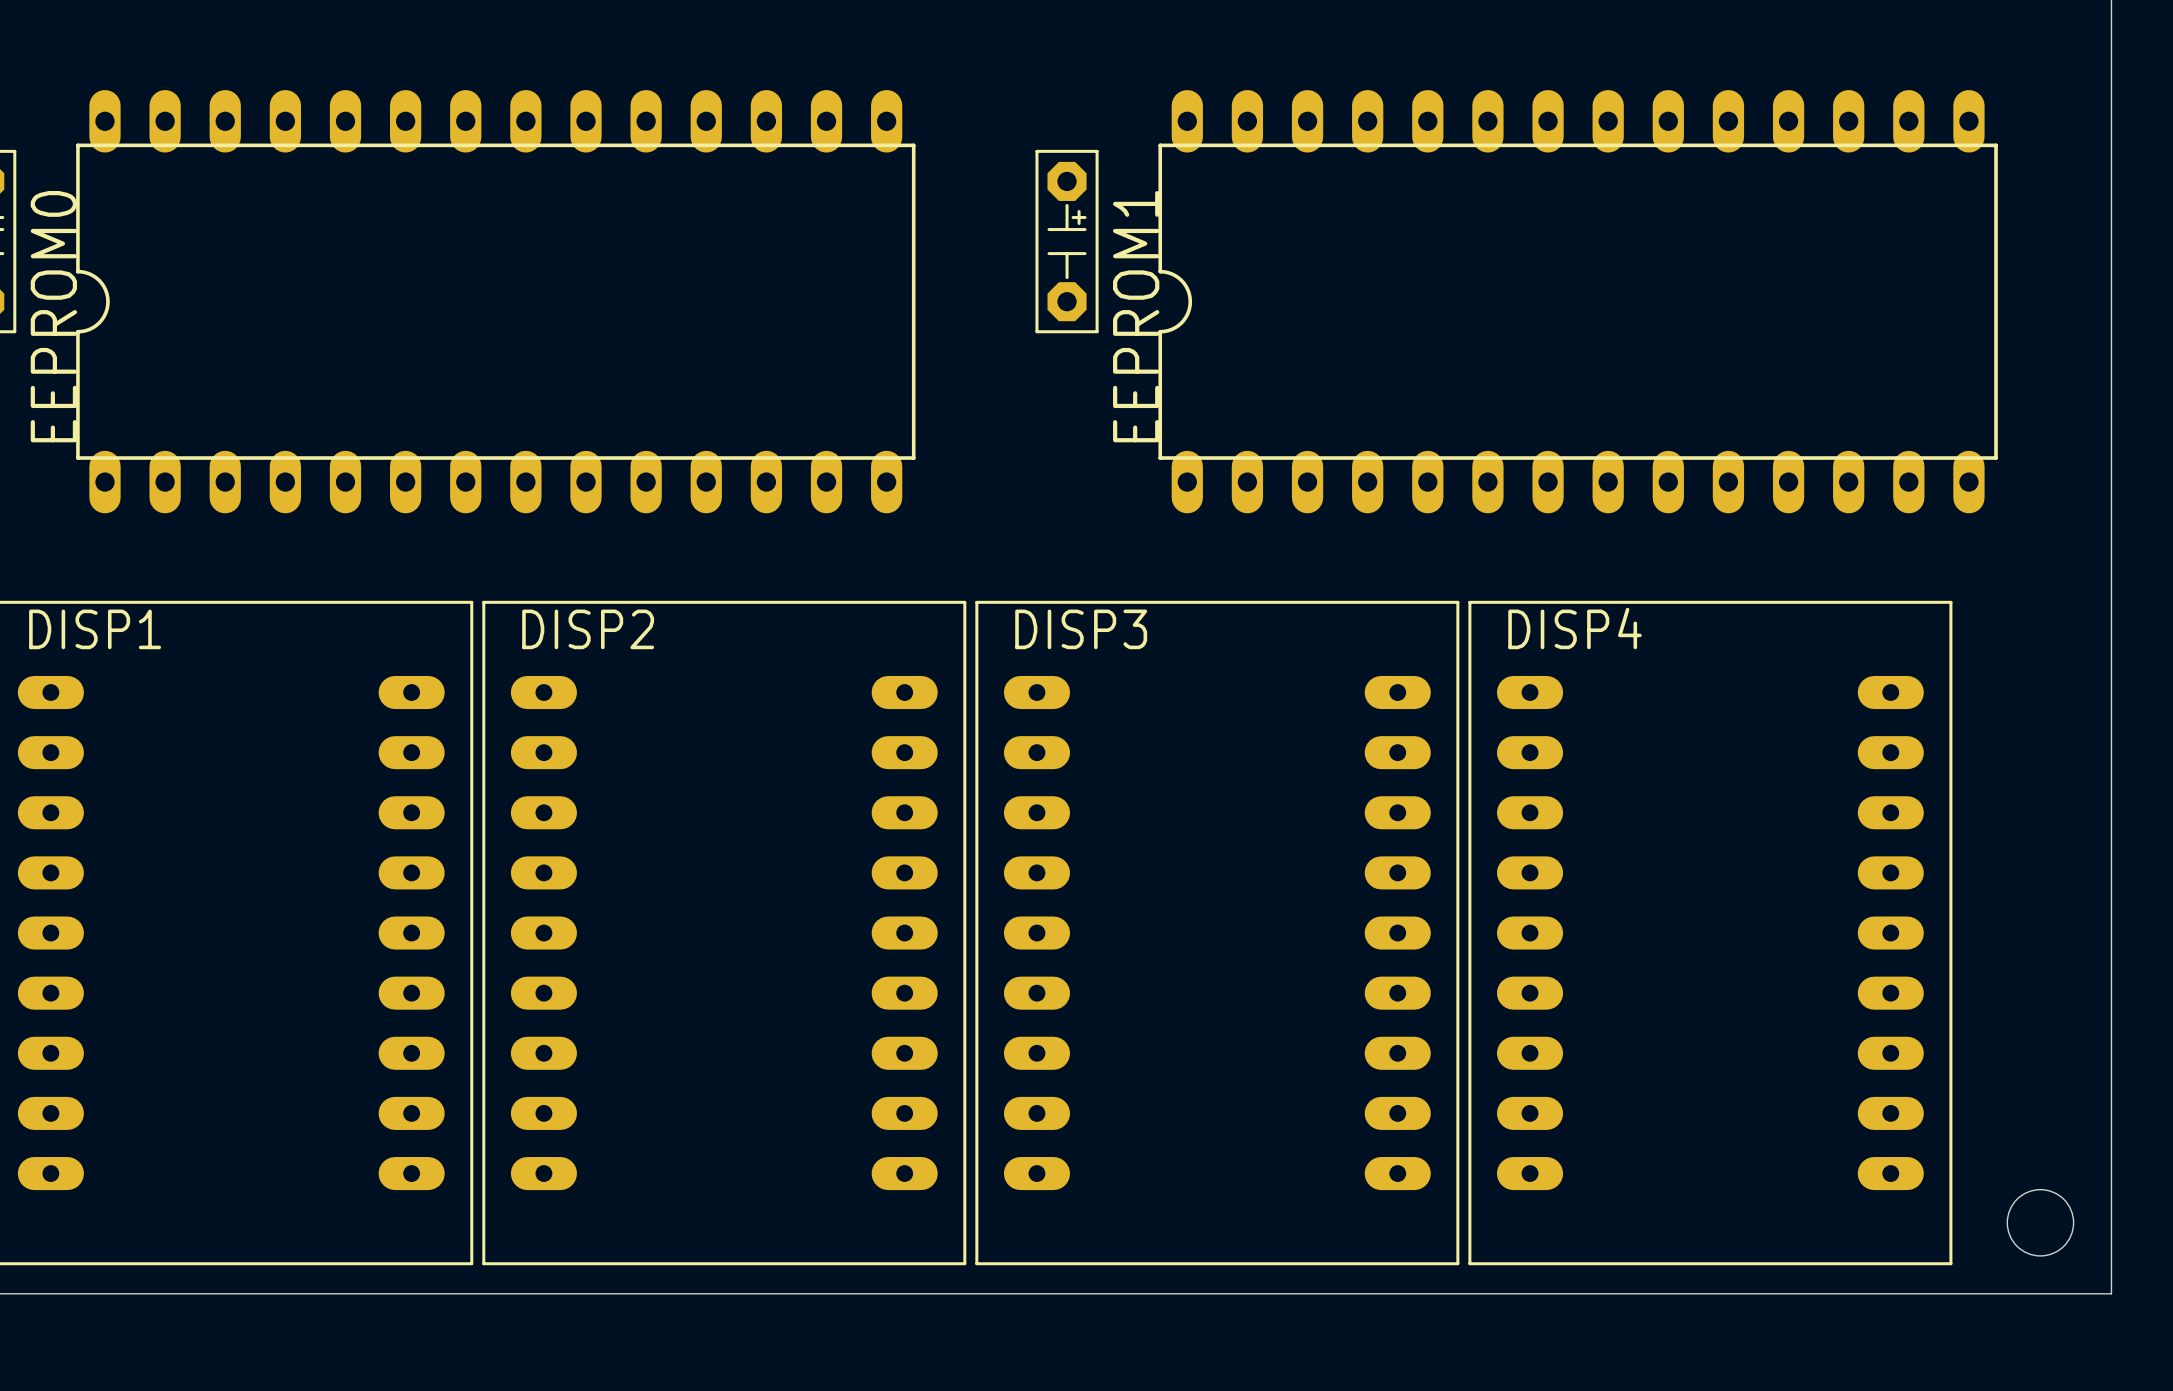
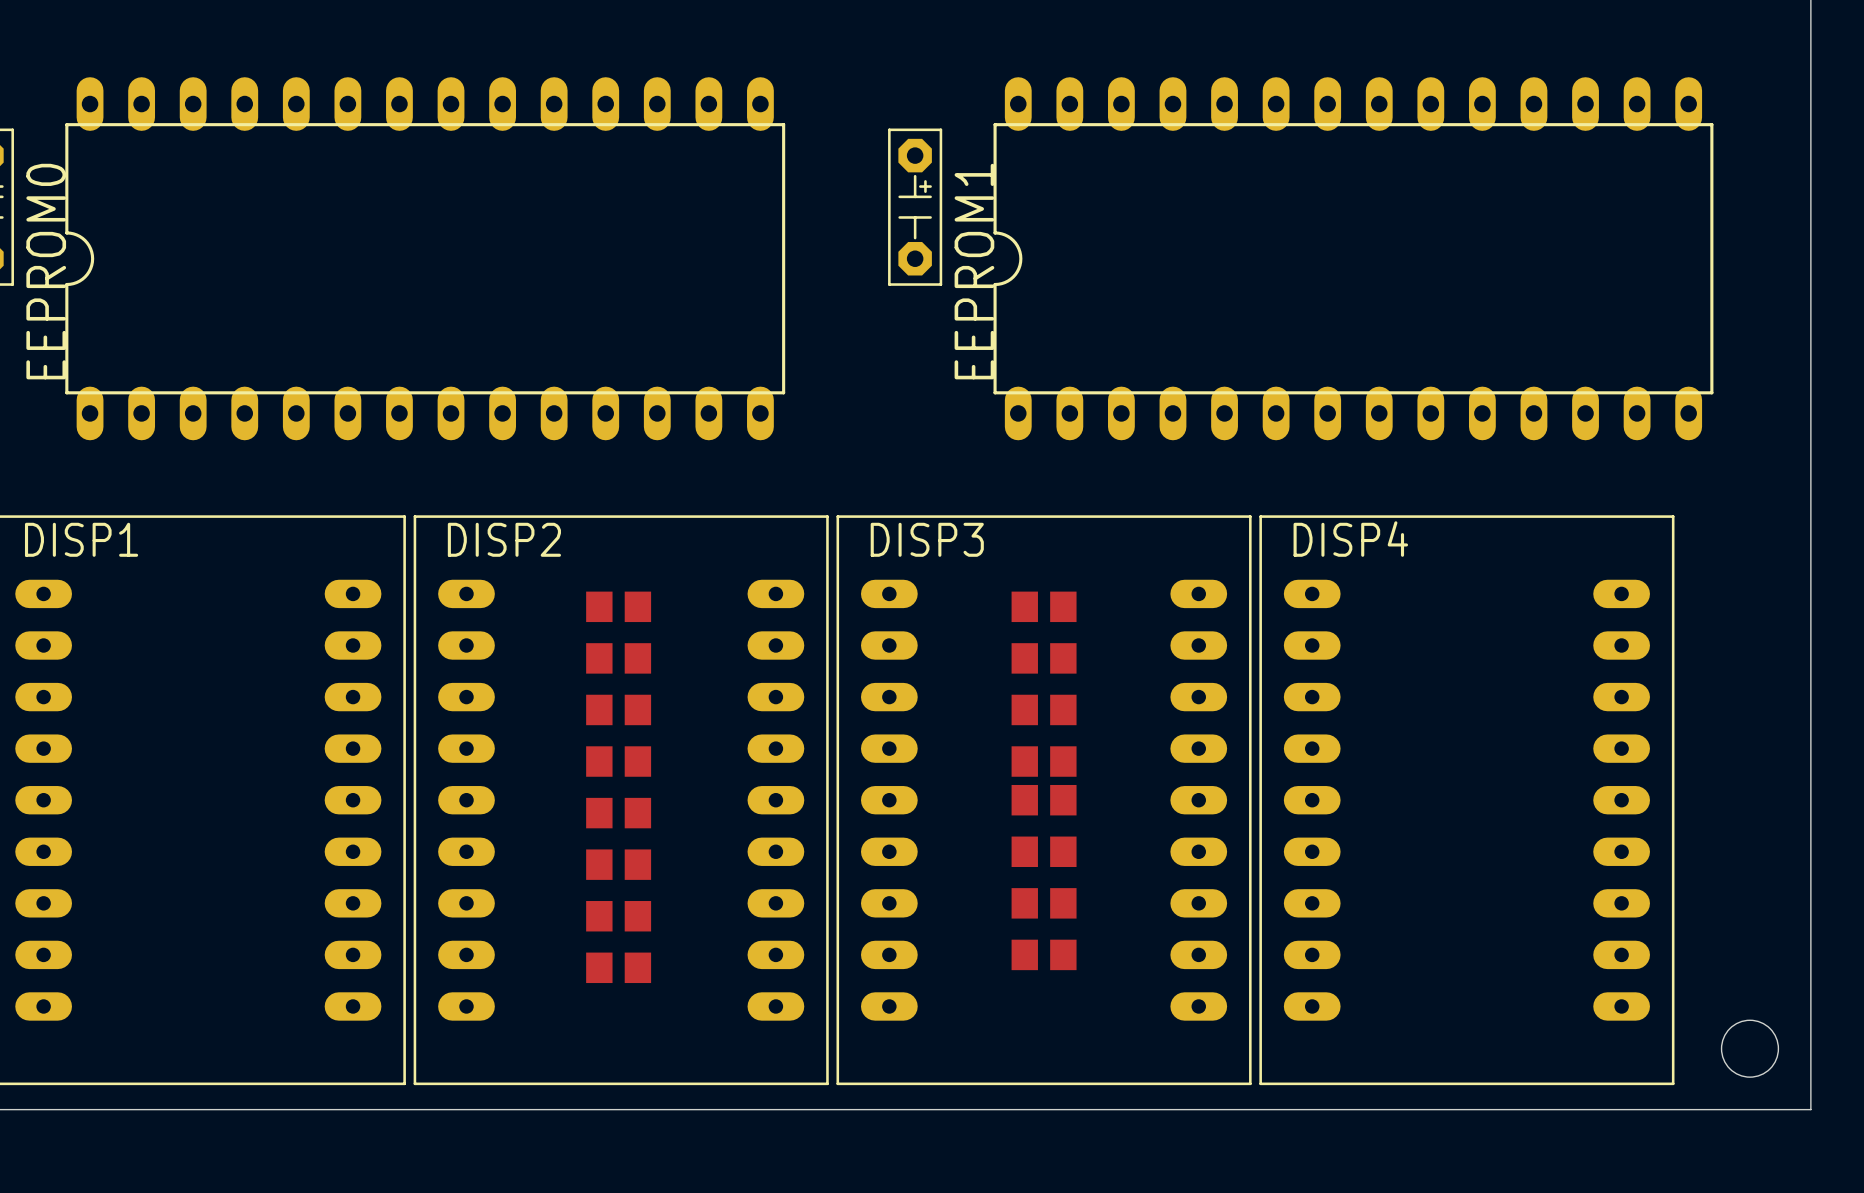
part: none -> (618, 606)
part: none -> (1044, 606)
part: none -> (618, 658)
part: none -> (1044, 658)
part: none -> (618, 709)
part: none -> (1044, 709)
part: none -> (618, 761)
part: none -> (1044, 761)
part: none -> (1044, 800)
part: none -> (618, 813)
part: none -> (1044, 851)
part: none -> (618, 864)
part: none -> (1044, 903)
part: none -> (618, 916)
part: none -> (1044, 954)
part: none -> (618, 967)

